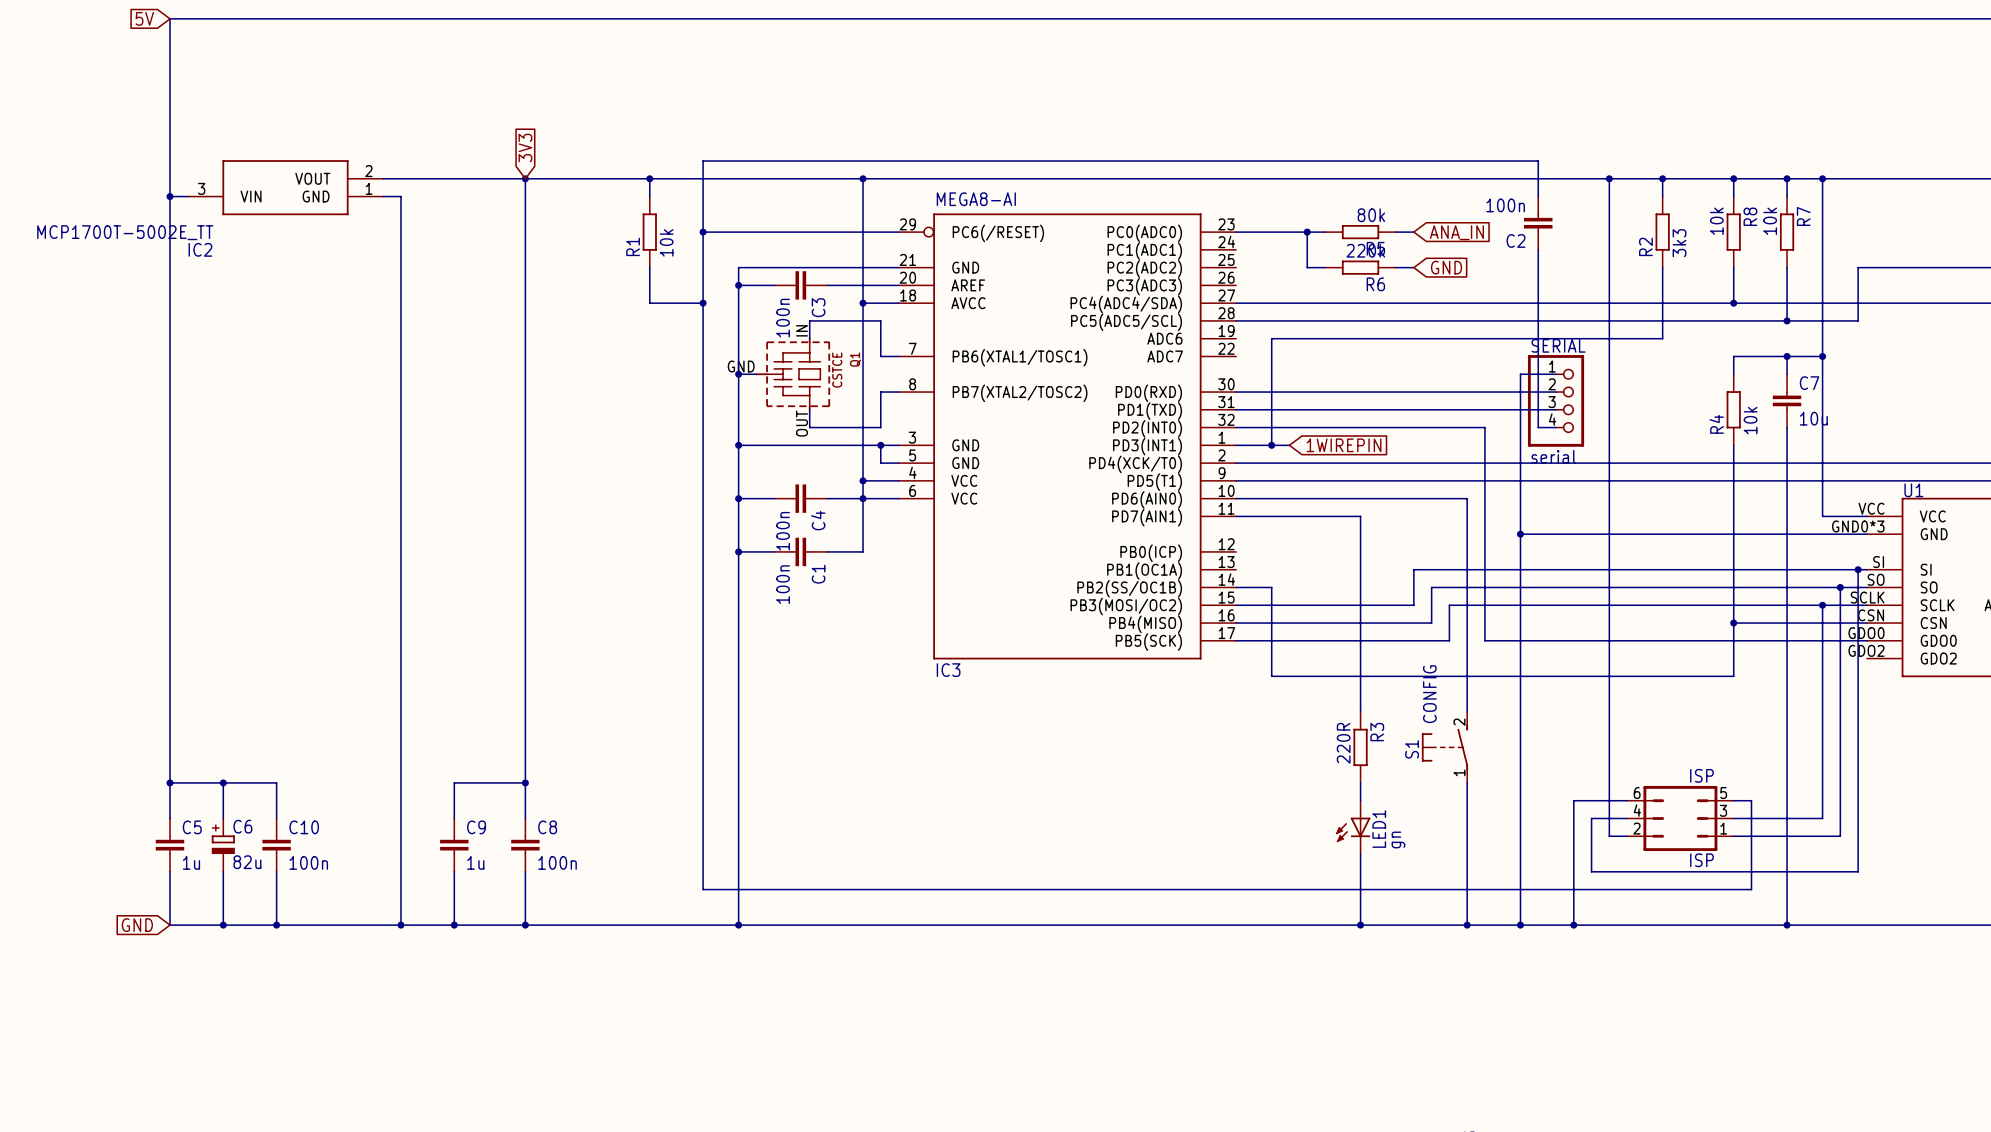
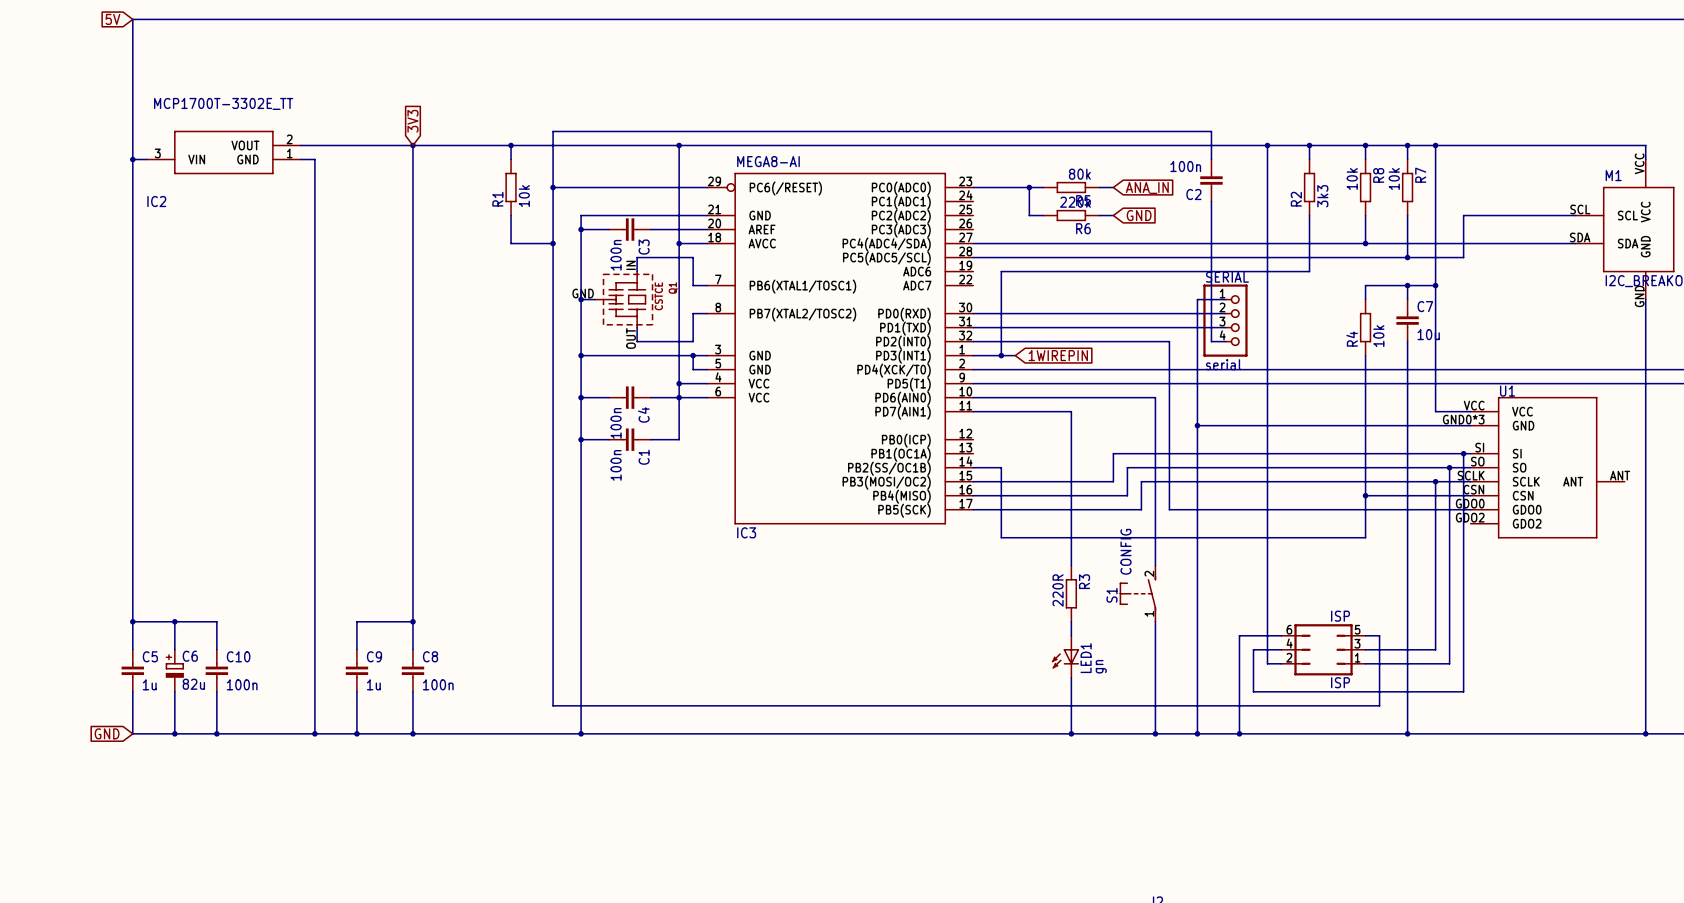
IC2 value: MCP1700T-5002E_TT (125, 232) -> MCP1700T-3302E_TT (223, 103)

